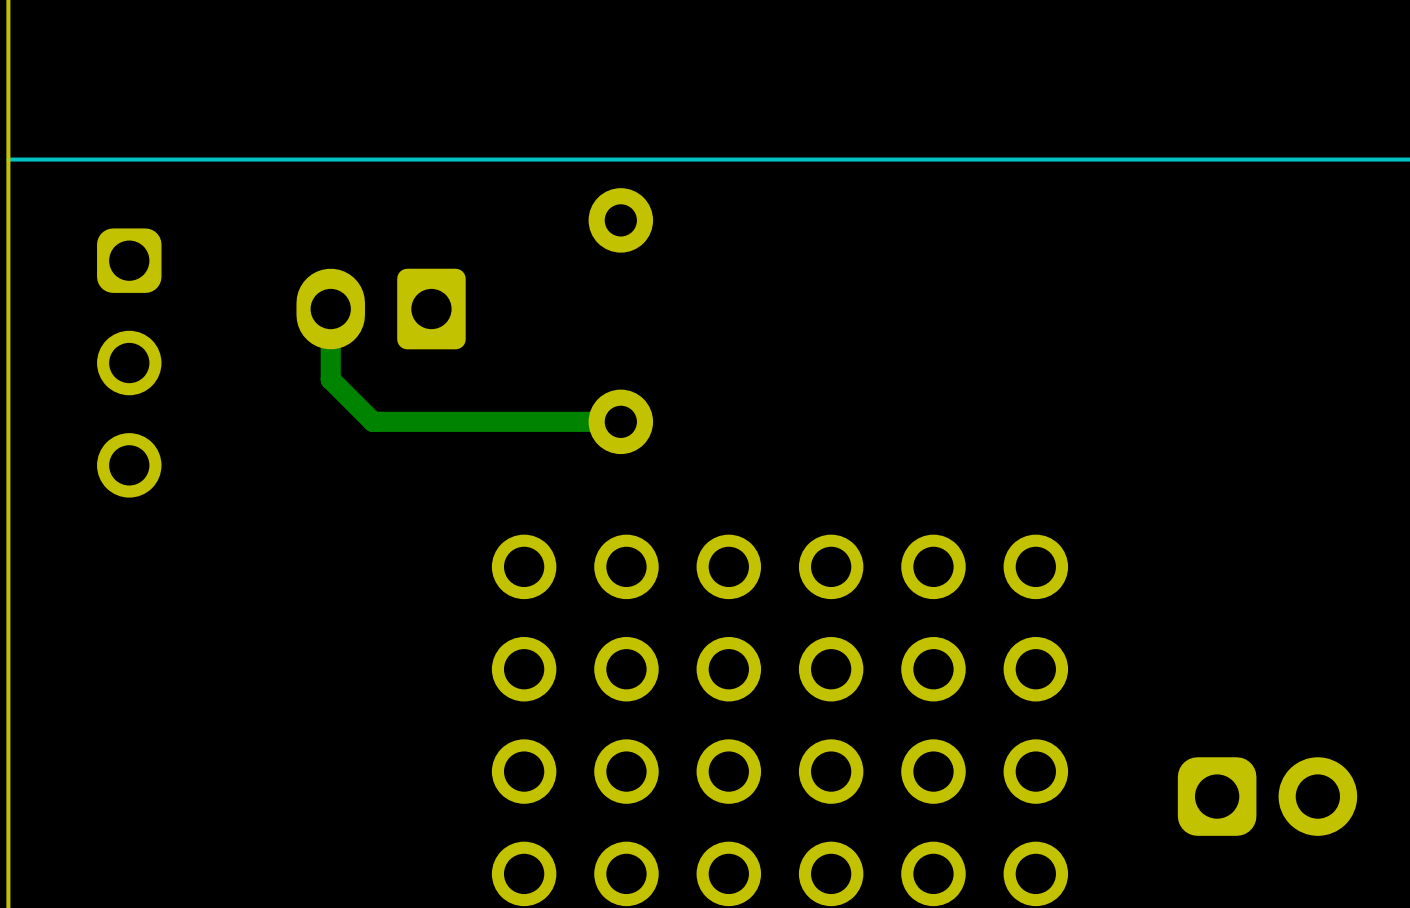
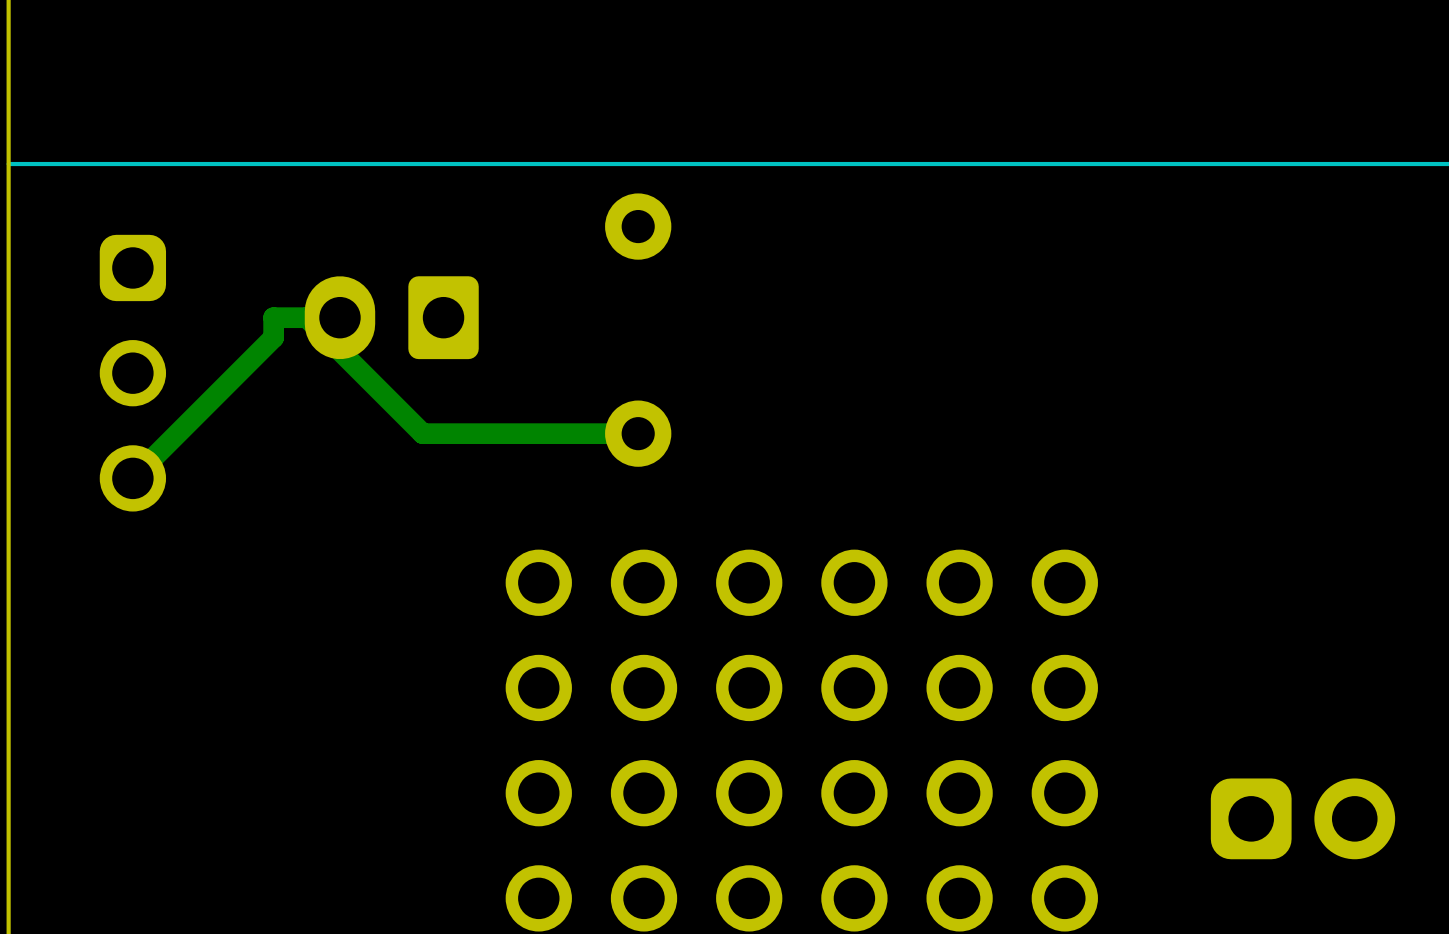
track: (330, 309) (330, 379) (372, 421) (411, 421) -> (306, 317) (422, 433)
track: none -> (339, 317) (273, 317) (273, 337) (132, 478)

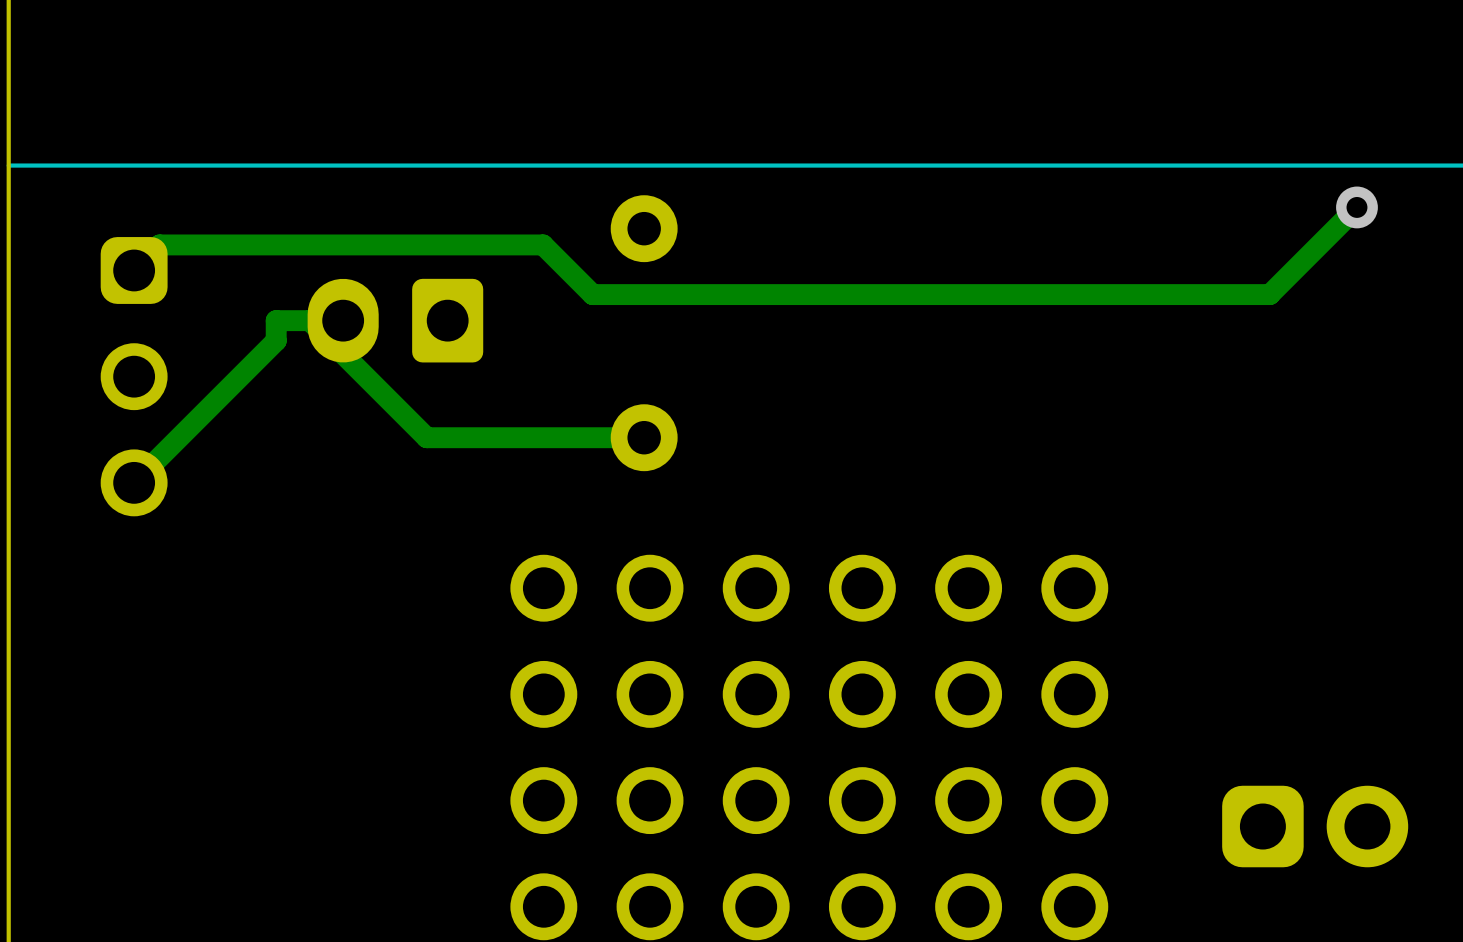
track: none -> (1356, 207) (1269, 294) (592, 294) (543, 244) (159, 244) (134, 270)
via: none -> (1356, 207)

